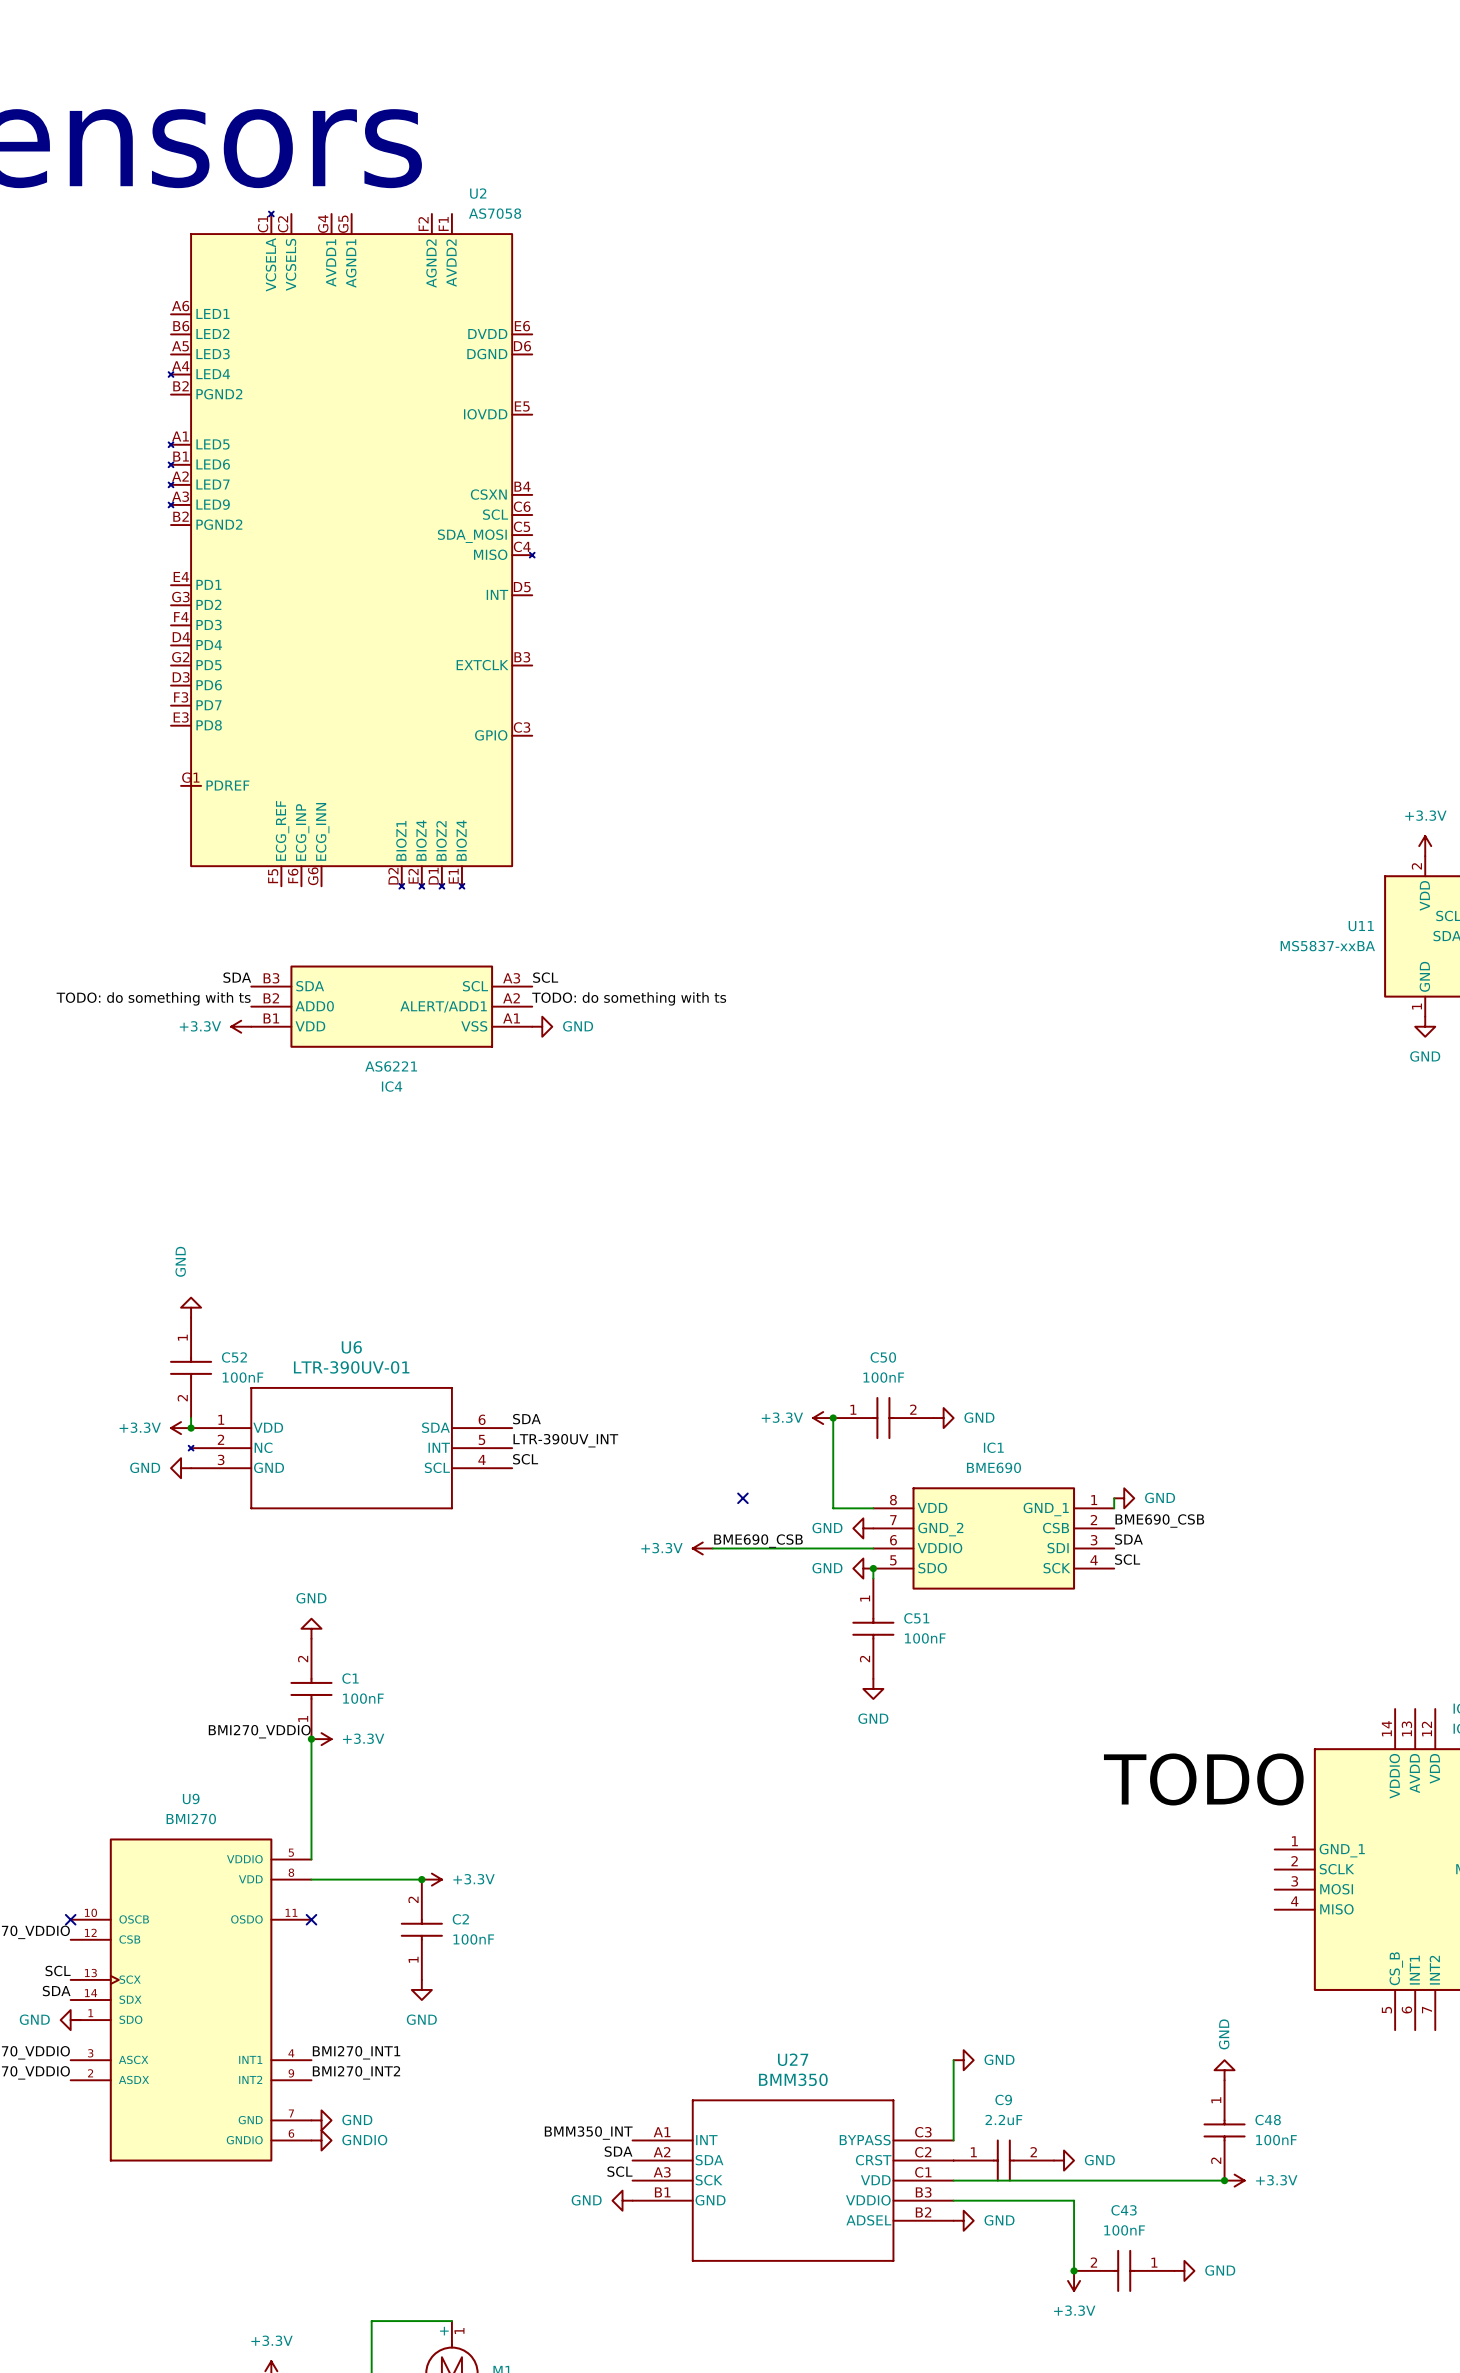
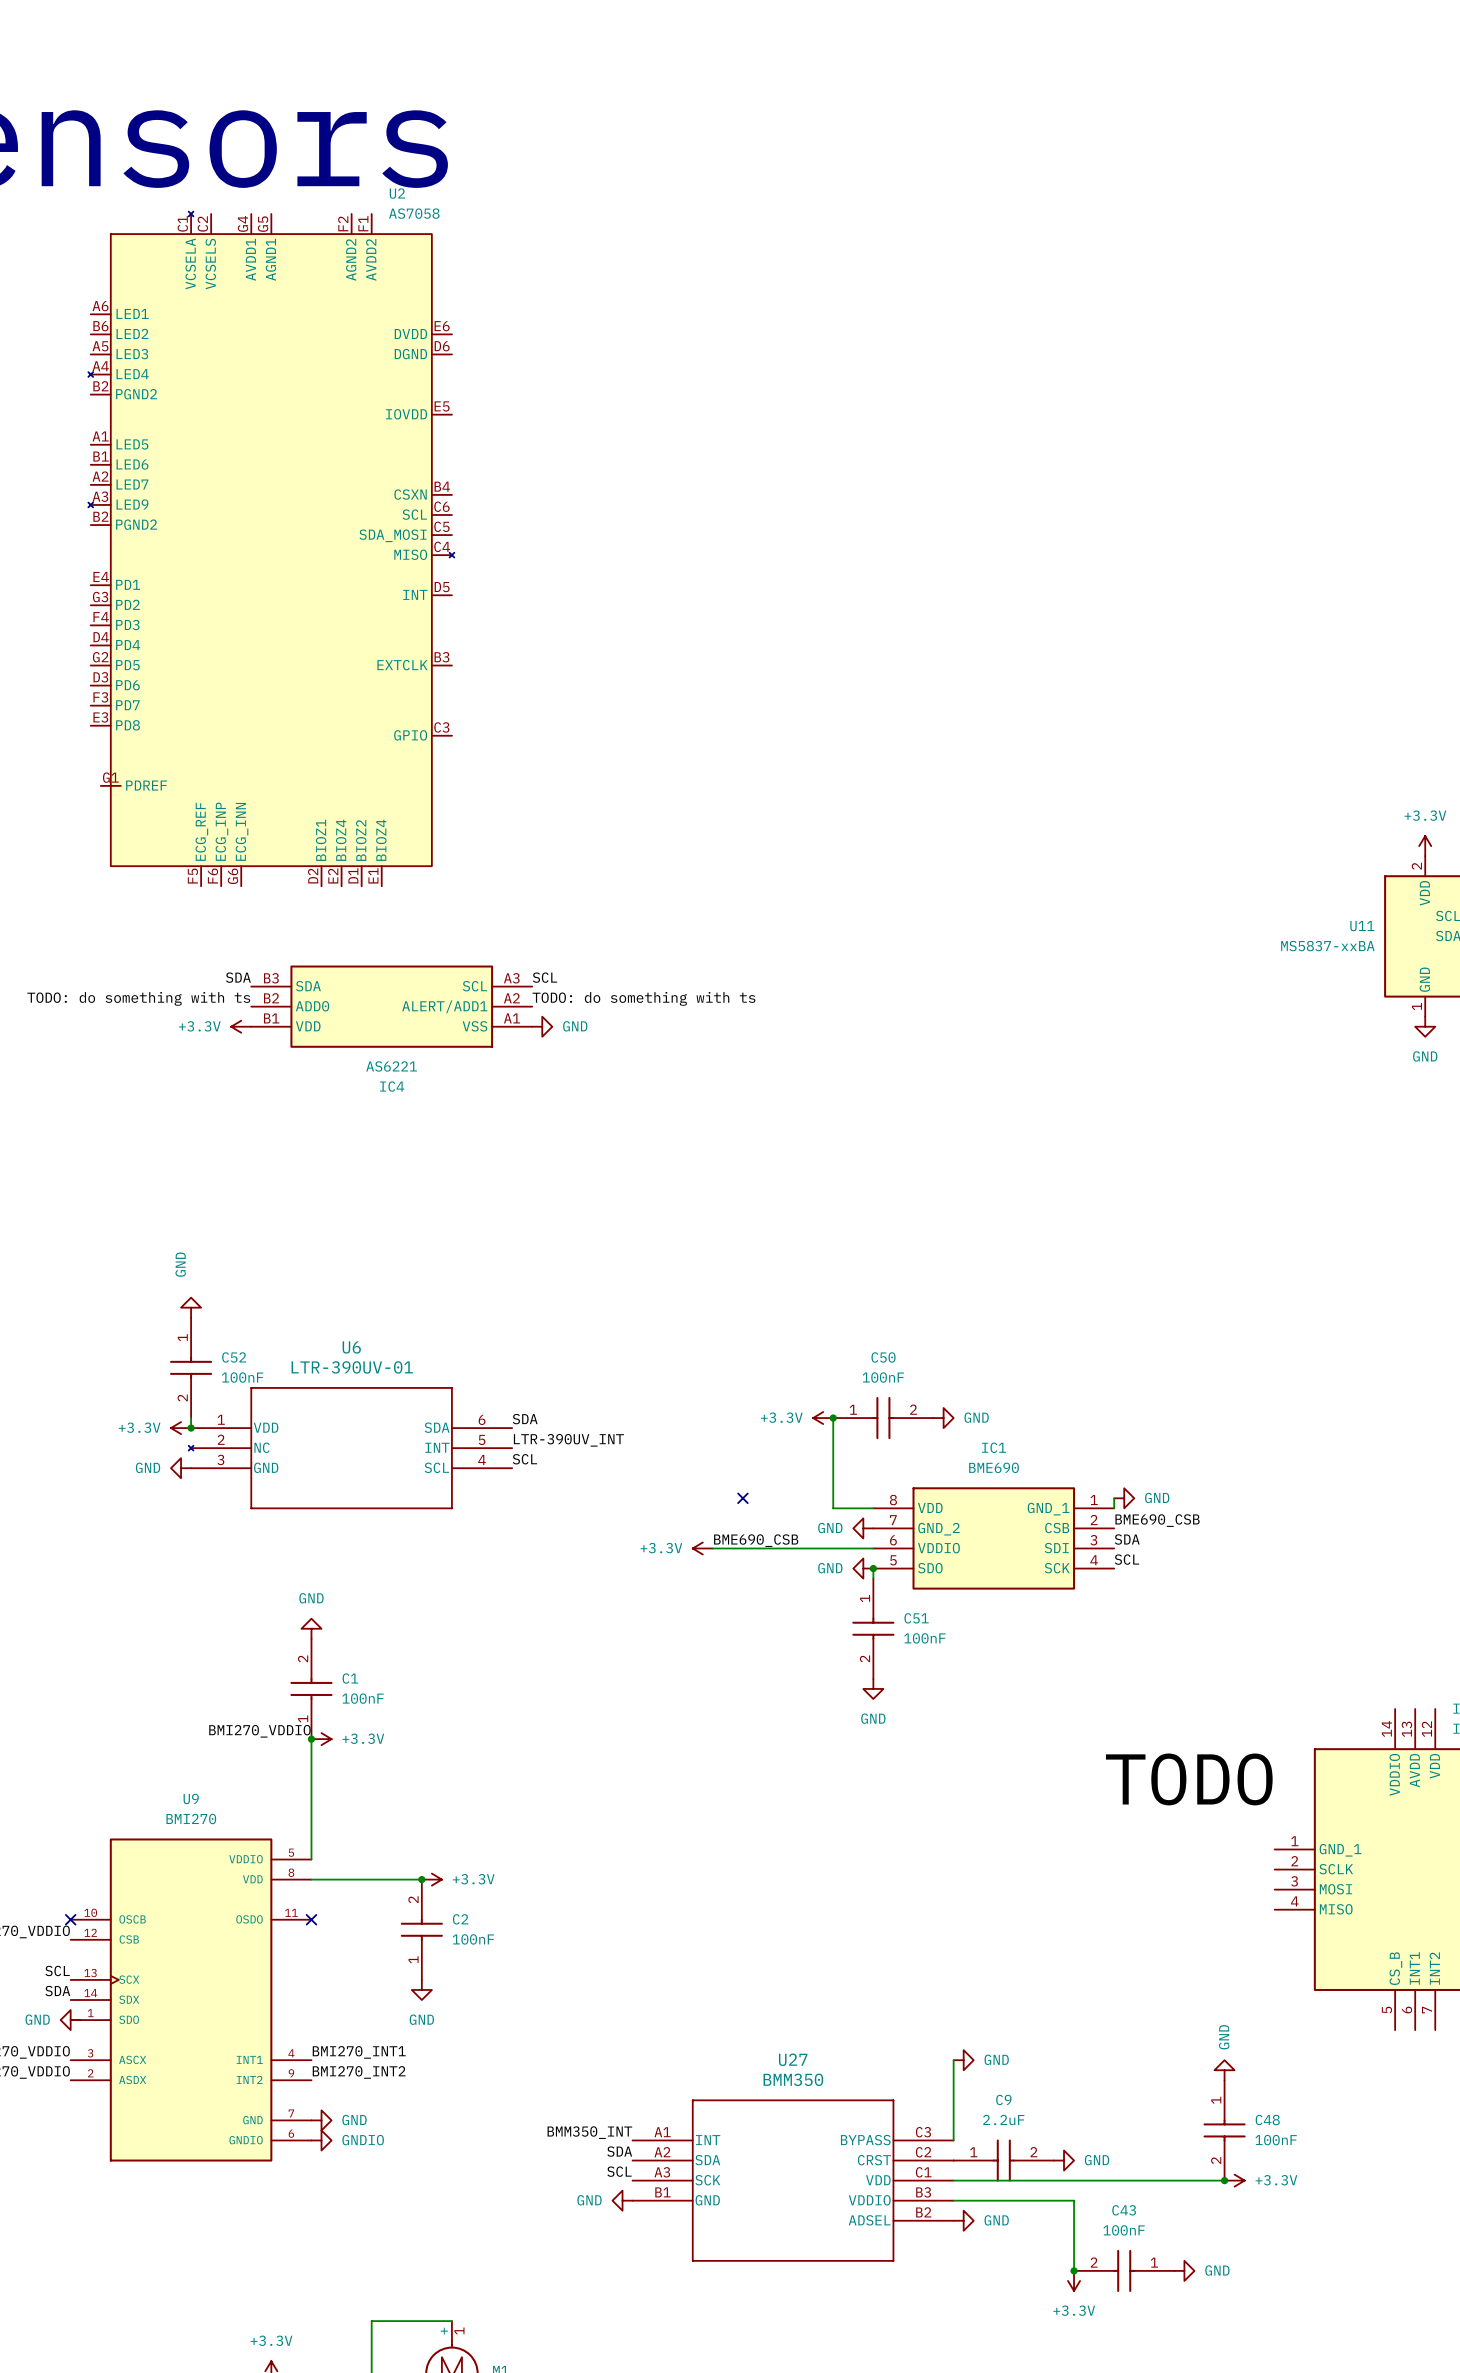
U2 symbol: [168, 211, 535, 889] -> [88, 211, 455, 887]

